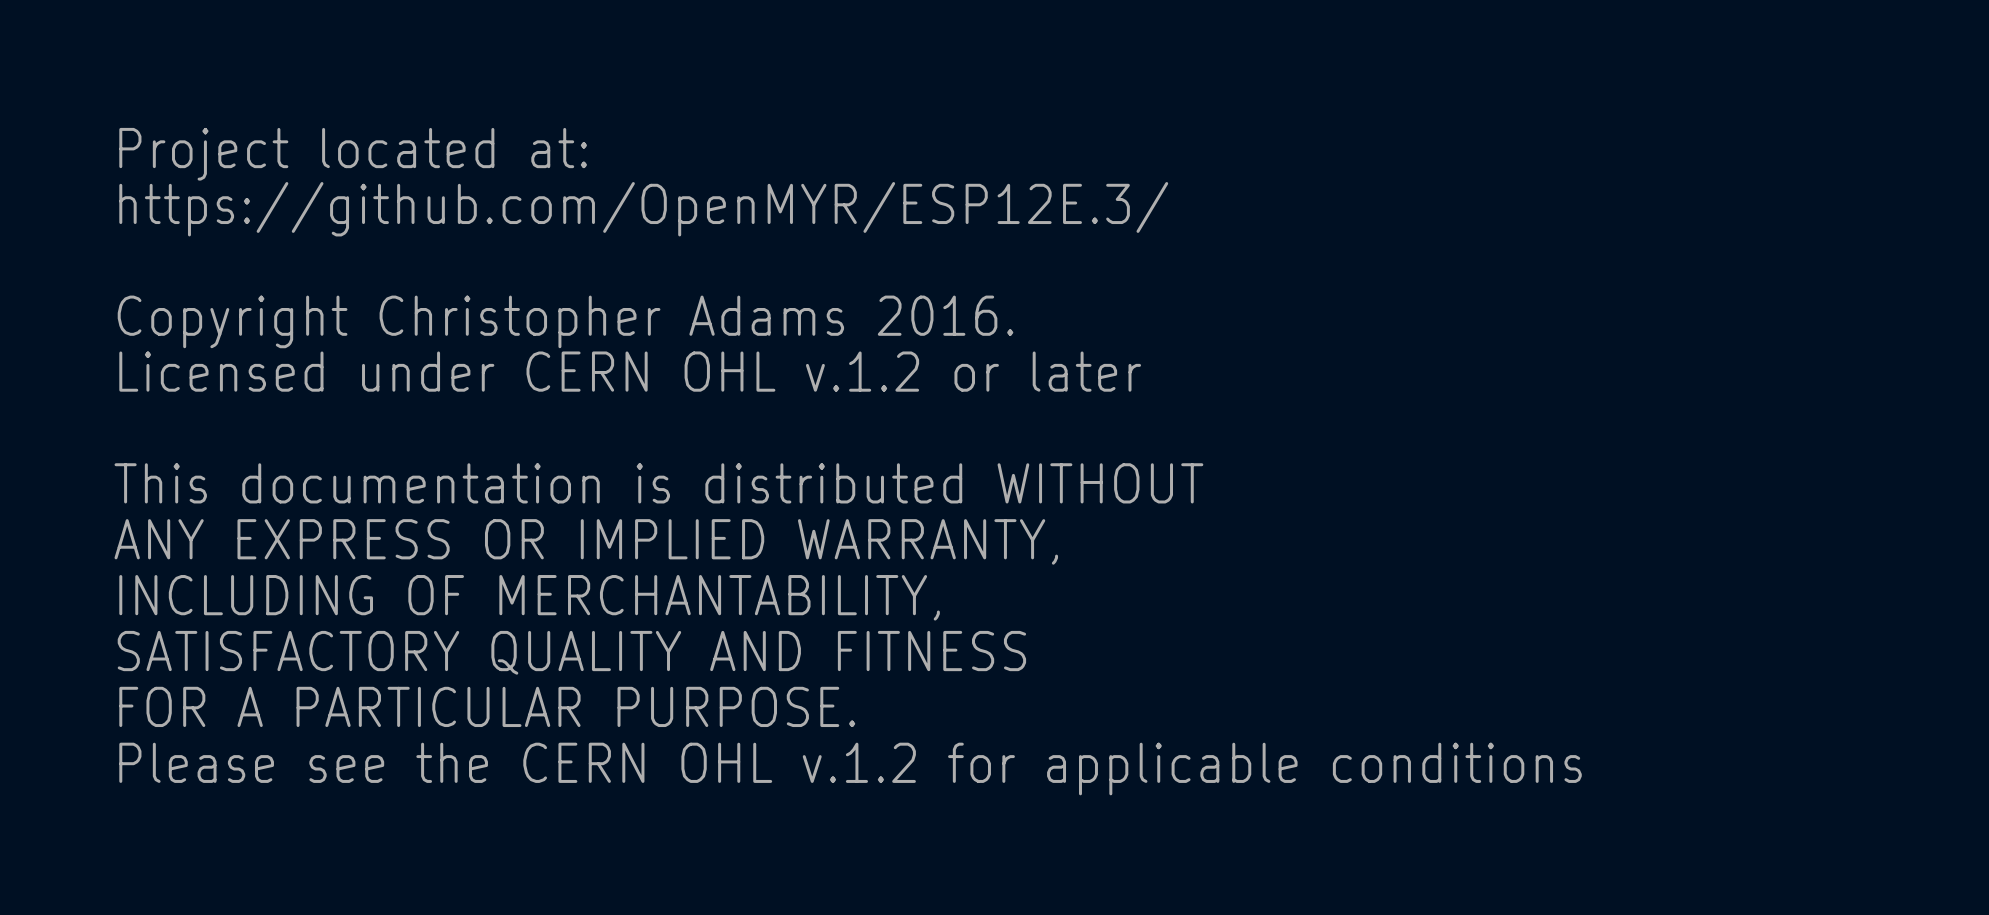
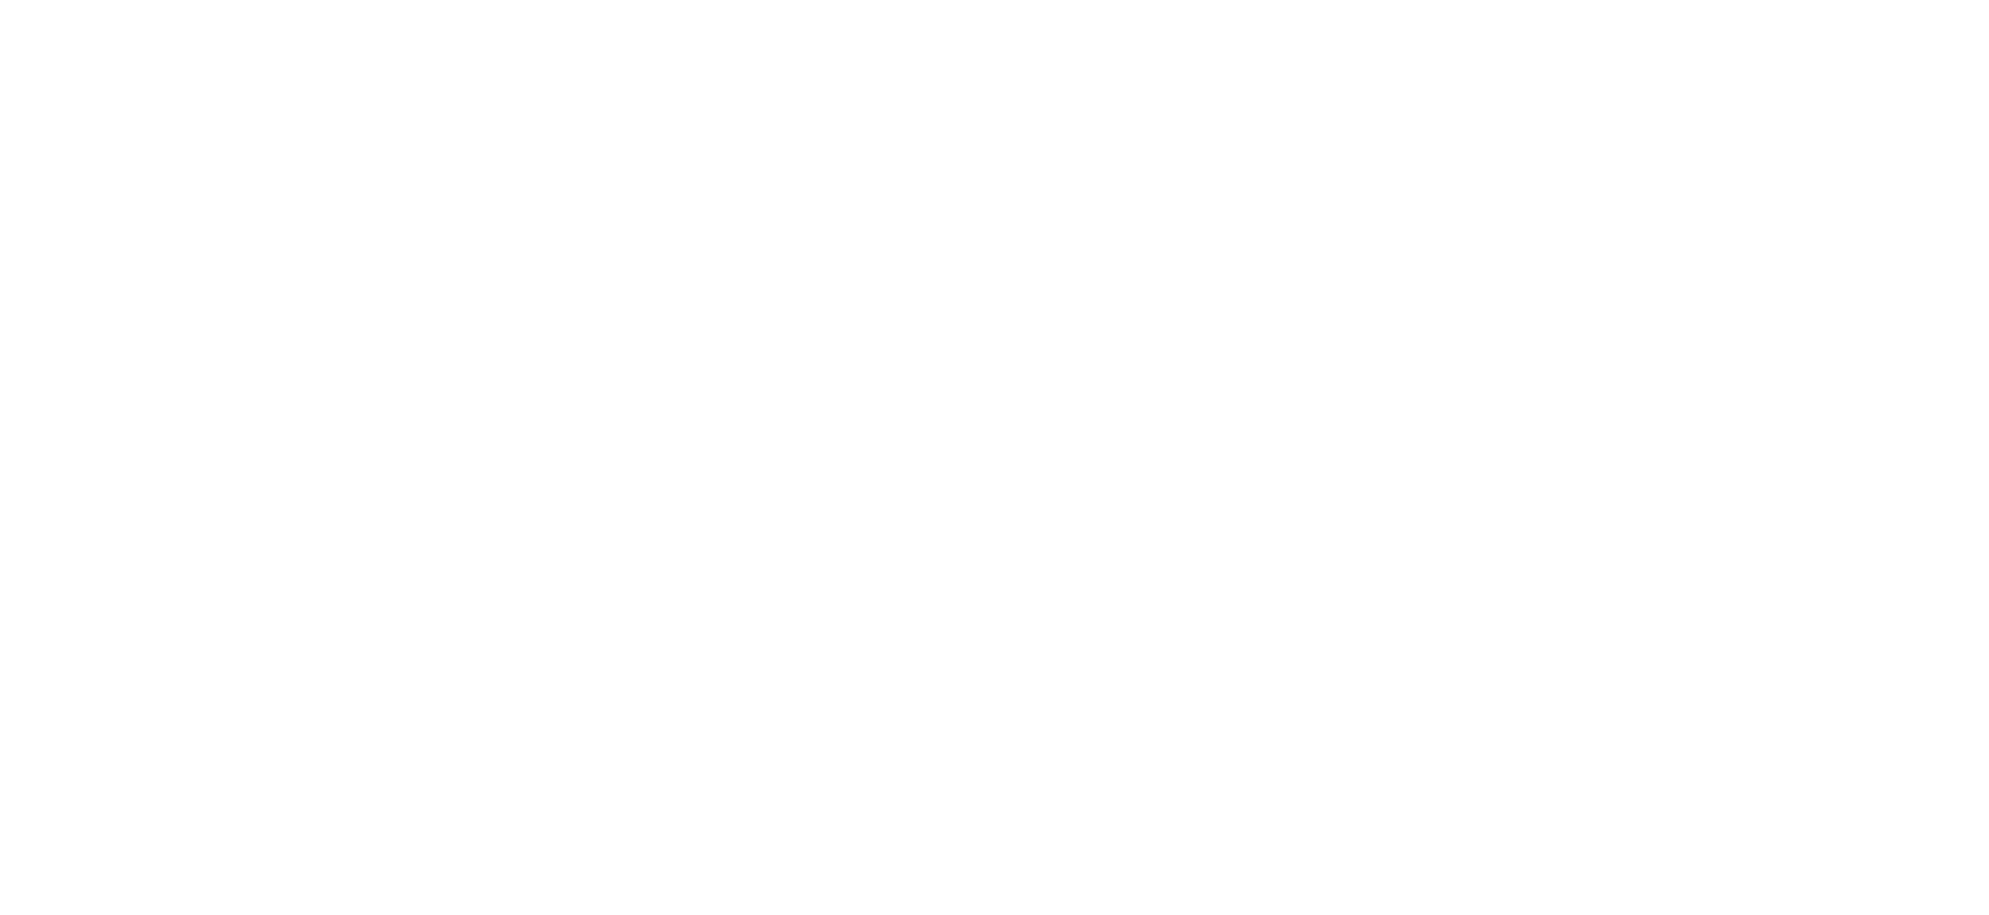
text: Project located at: (353, 154) -> none
text: https://github.com/OpenMYR/ESP12E.3/ (643, 209) -> none
text: Copyright Christopher Adams 2016. (565, 321) -> none
text: Licensed under CERN OHL v.1.2 or later (630, 371) -> none
text: This documentation is distributed WITHOUT (658, 483) -> none
text: ANY EXPRESS OR IMPLIED WARRANTY, (586, 541) -> none
text: INCLUDING OF MERCHANTABILITY, (529, 597) -> none
text: SATISFACTORY QUALITY AND FITNESS (571, 652) -> none
text: FOR A PARTICULAR PURPOSE. (487, 706) -> none
text: Please see the CERN OHL v.1.2 for applicable conditions (850, 769) -> none

